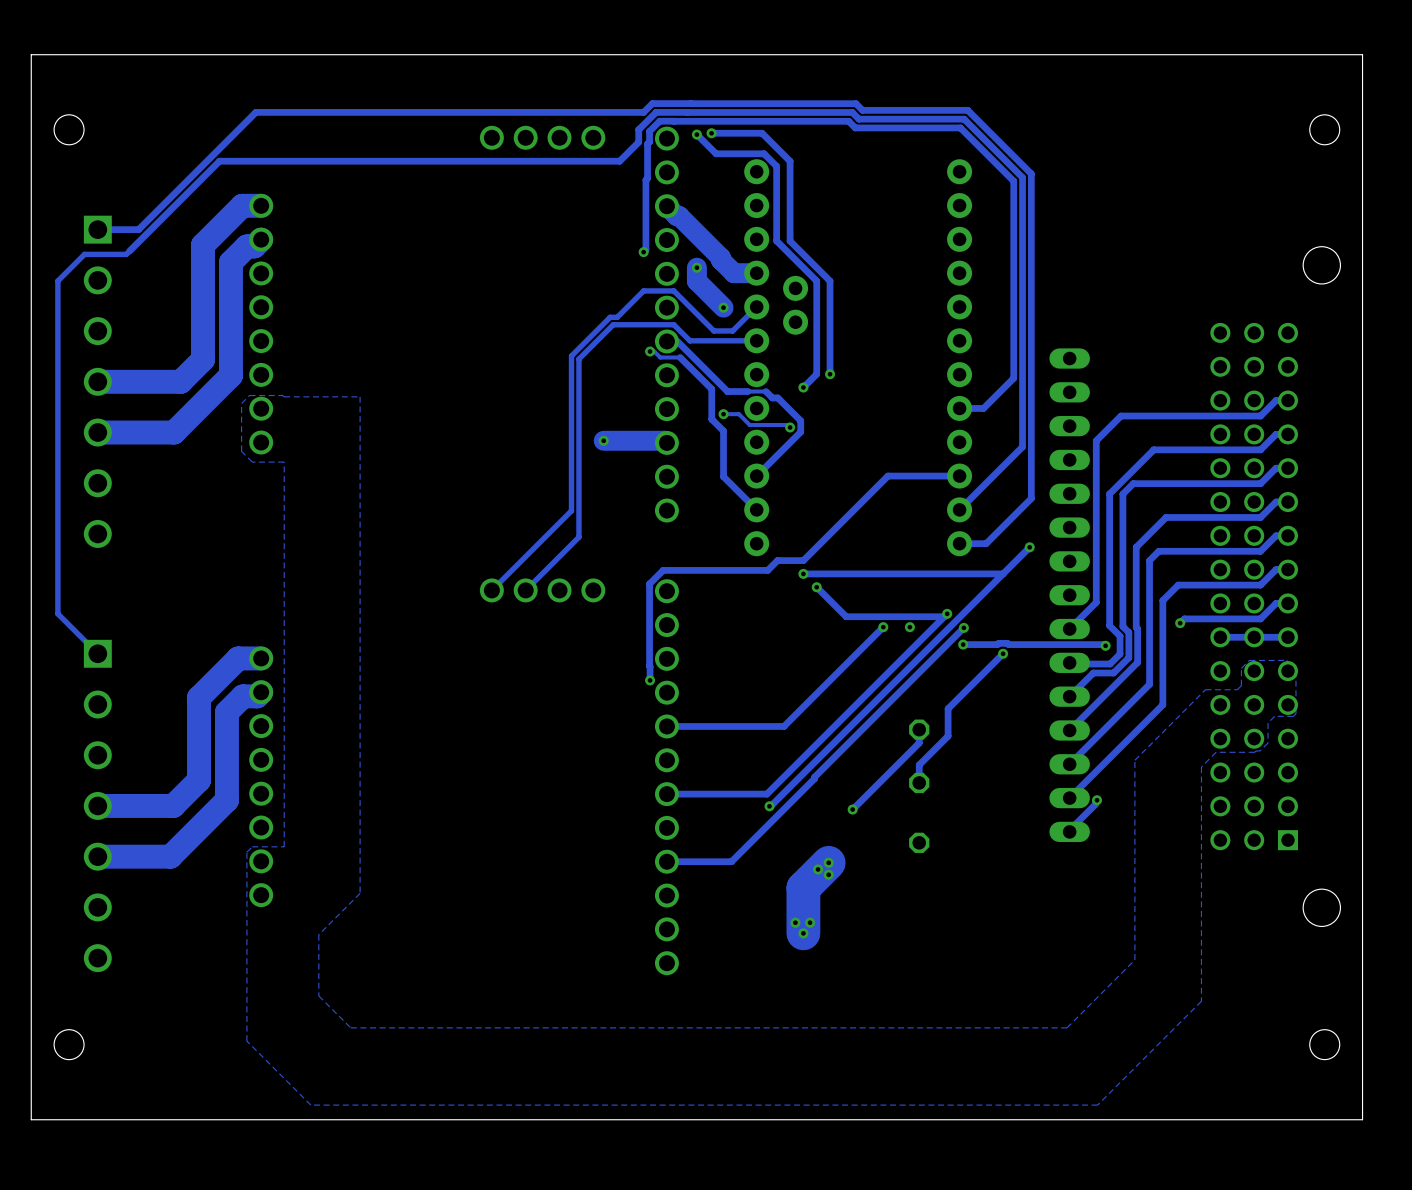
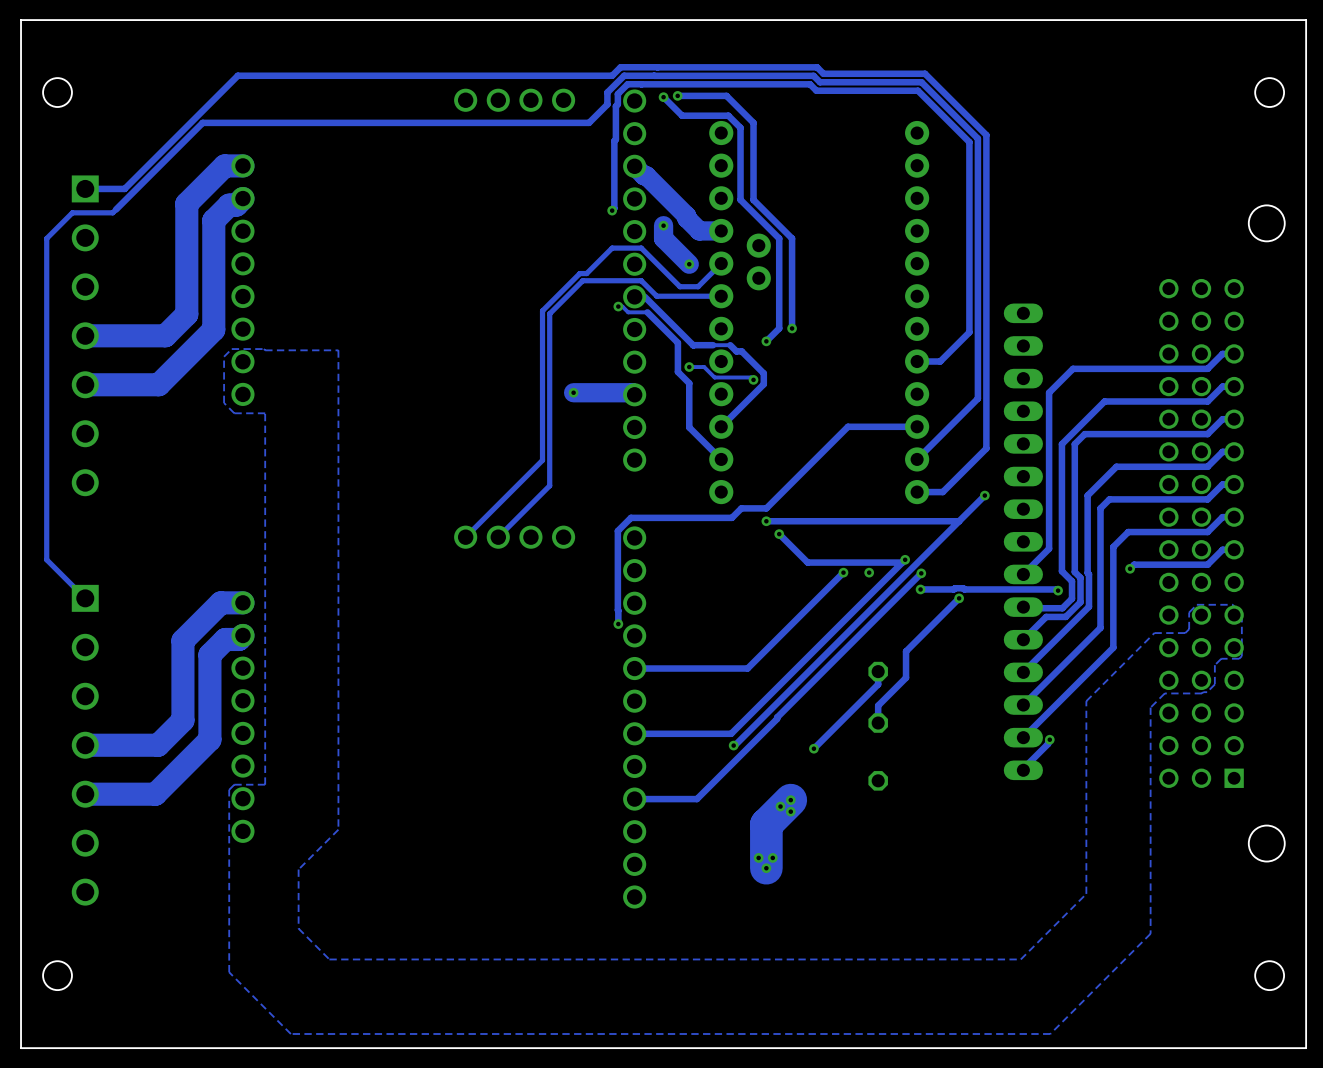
track: (1287, 637) (1220, 637) -> none

